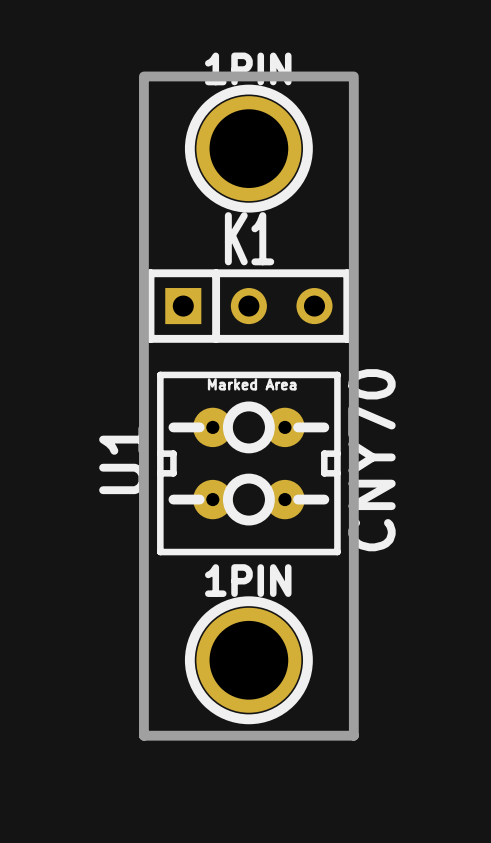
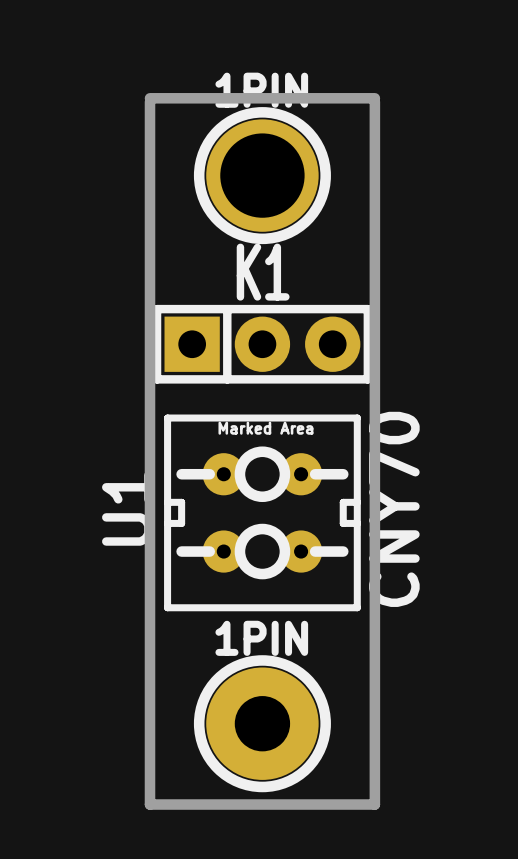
K1 footprint: [146, 269, 352, 343] -> [152, 304, 373, 384]
1PIN footprint: [184, 596, 313, 725] -> [193, 655, 331, 793]

